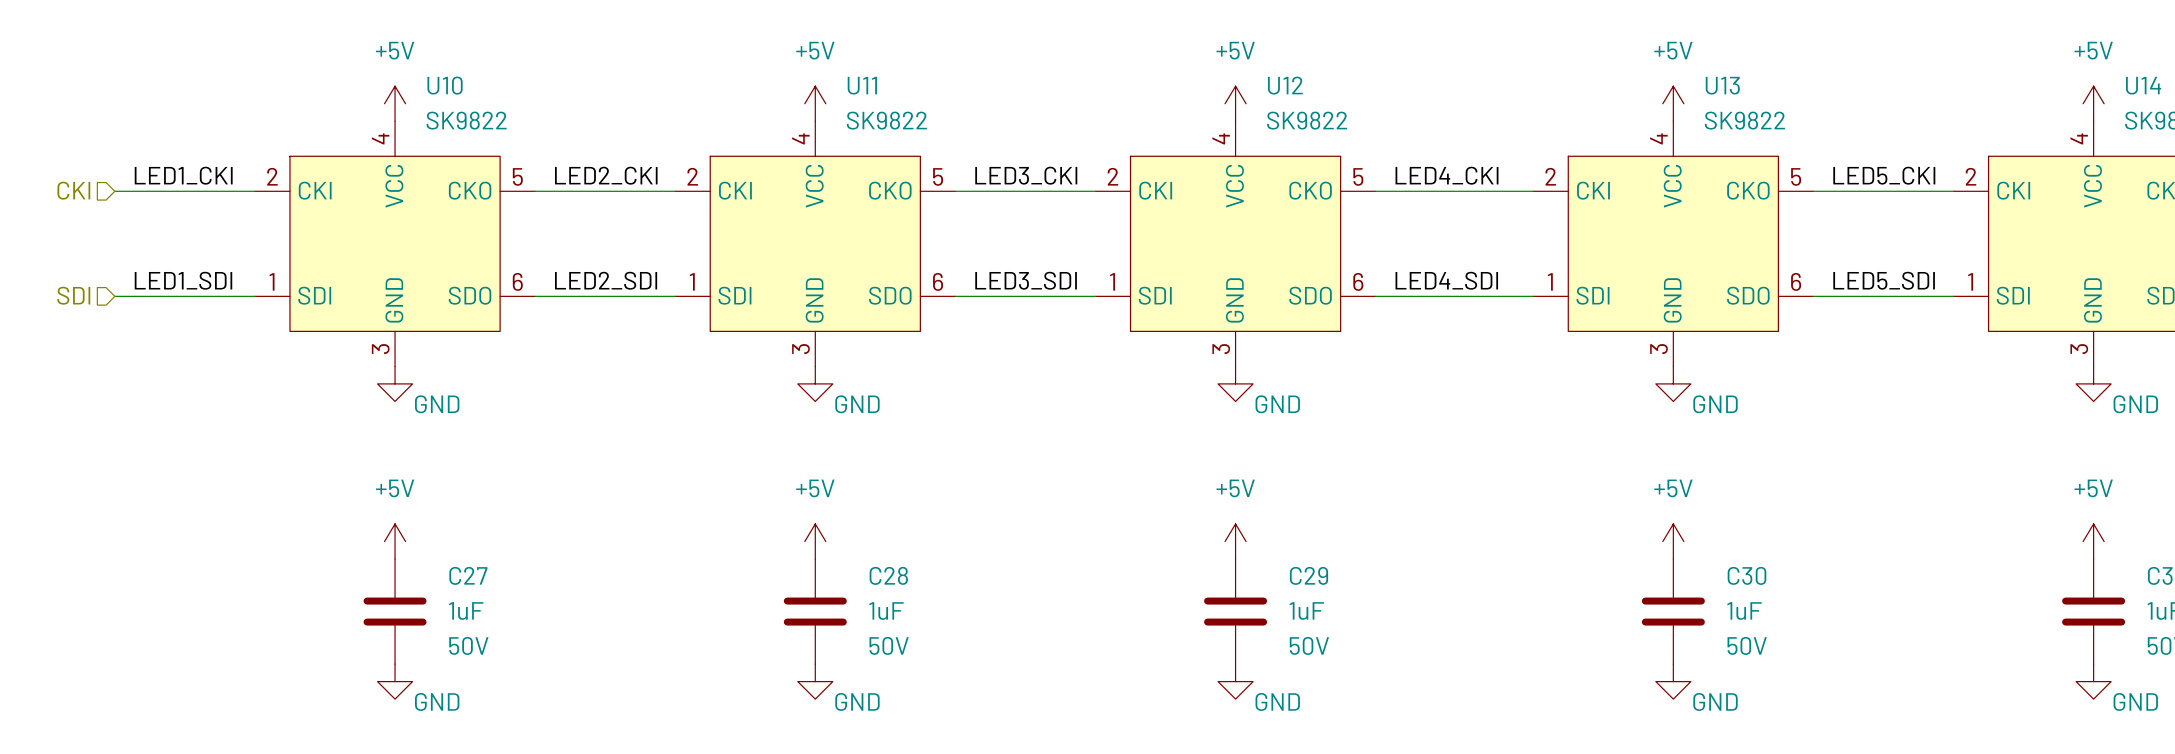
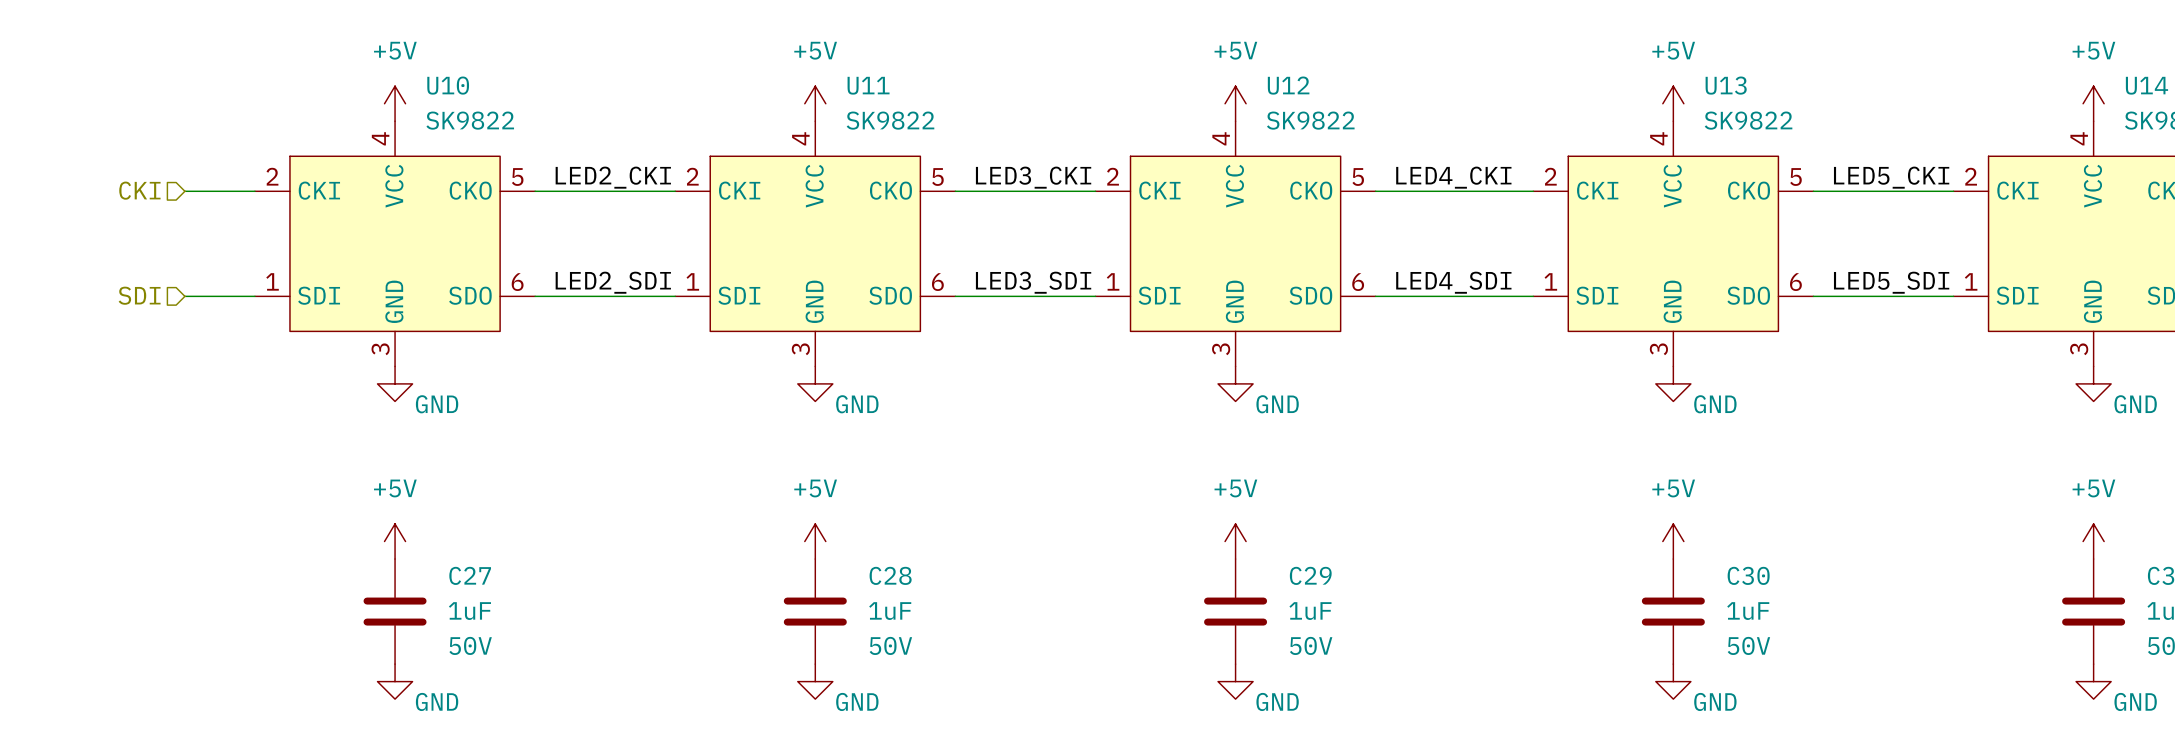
label: LED1_CKI (183, 175) -> none
hierarchical label position: CKI (73, 190) -> CKI (139, 190)
wire: (114, 191) (184, 191) -> none
label: LED1_SDI (183, 280) -> none
hierarchical label position: SDI (73, 295) -> SDI (139, 295)
wire: (114, 296) (184, 296) -> none

